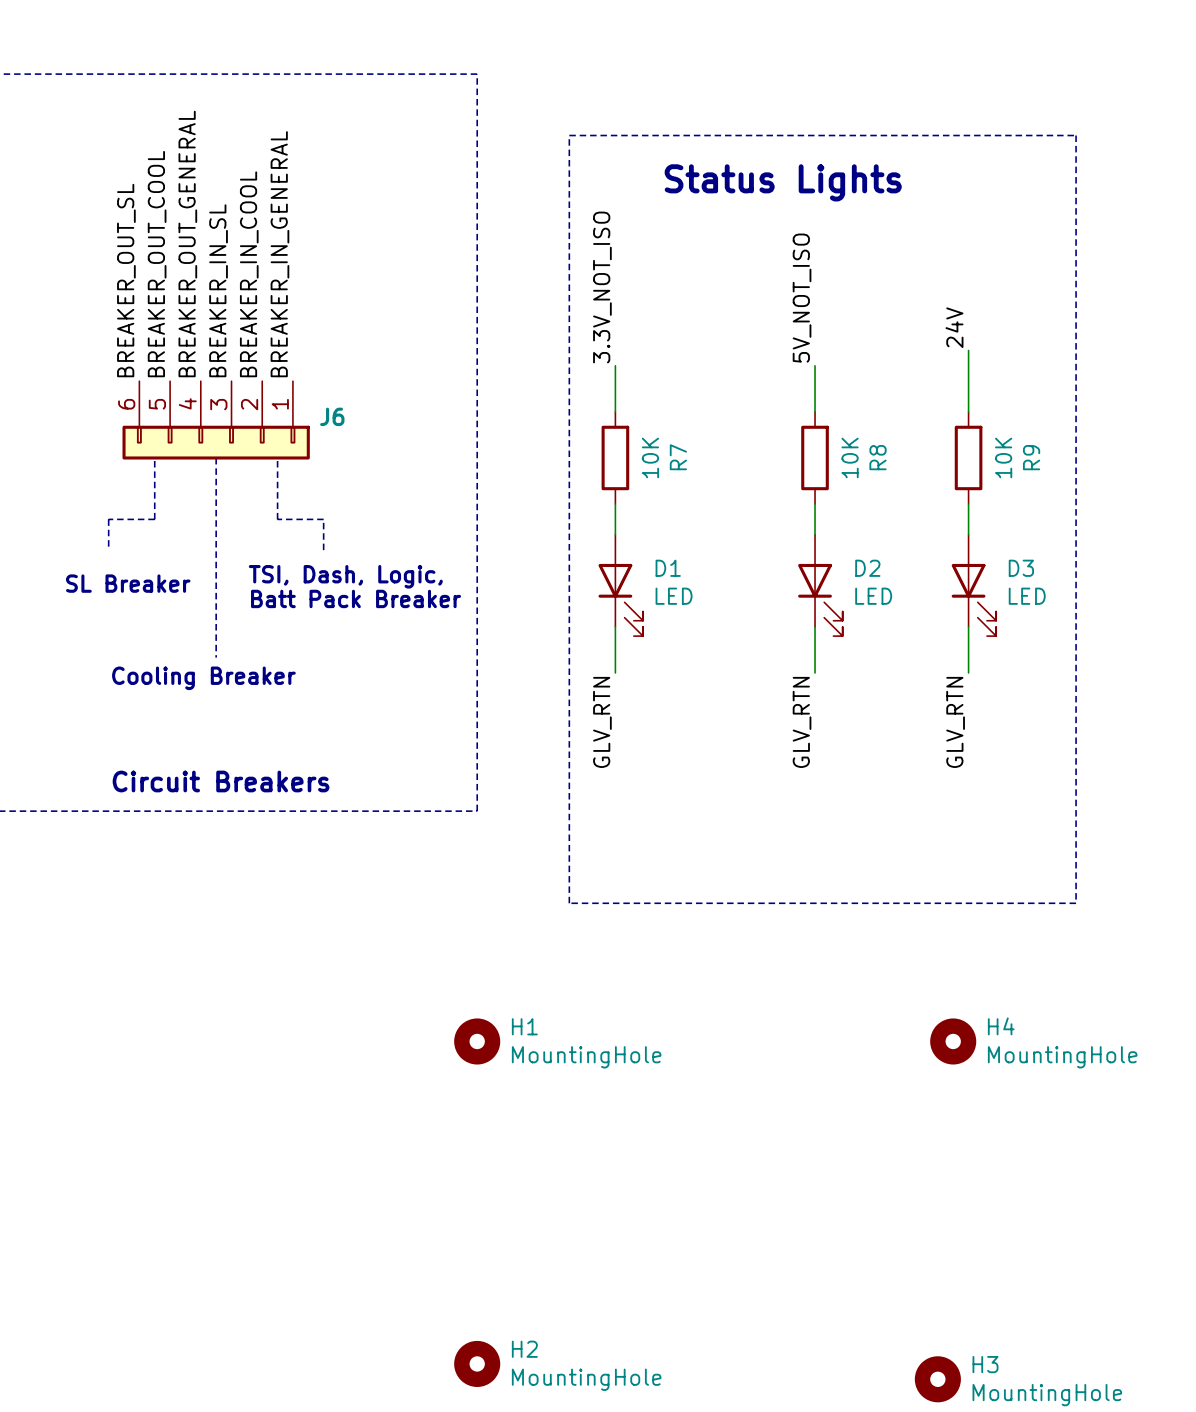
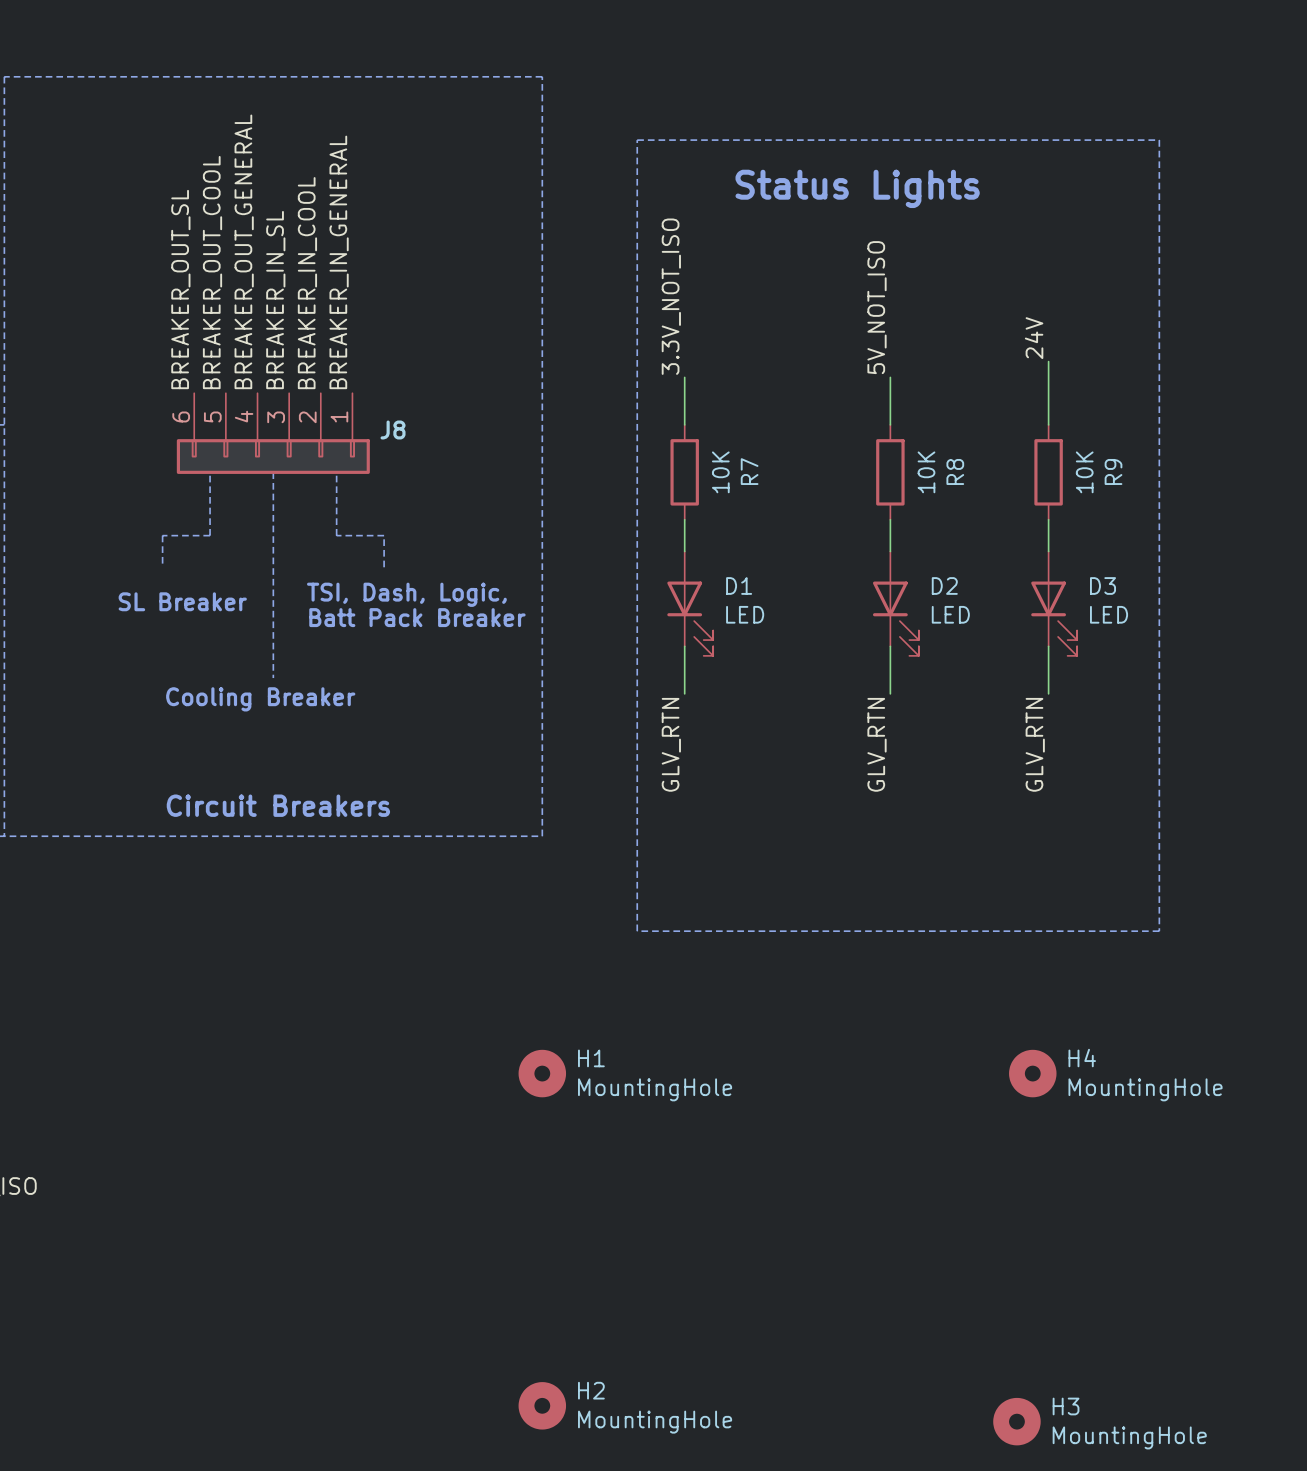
J6 name: J6 (332, 416) -> J8 (393, 429)

